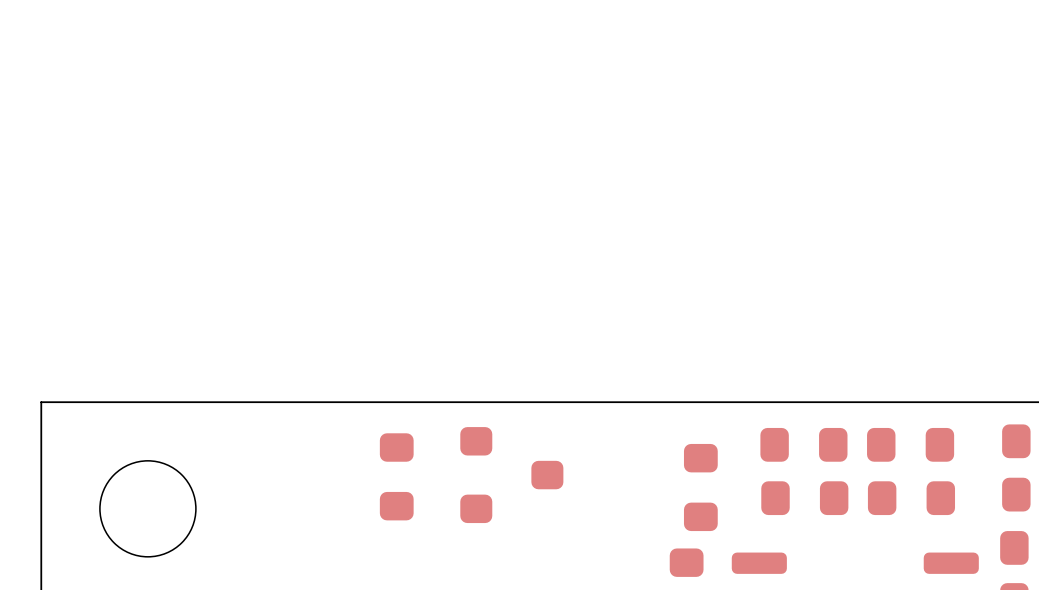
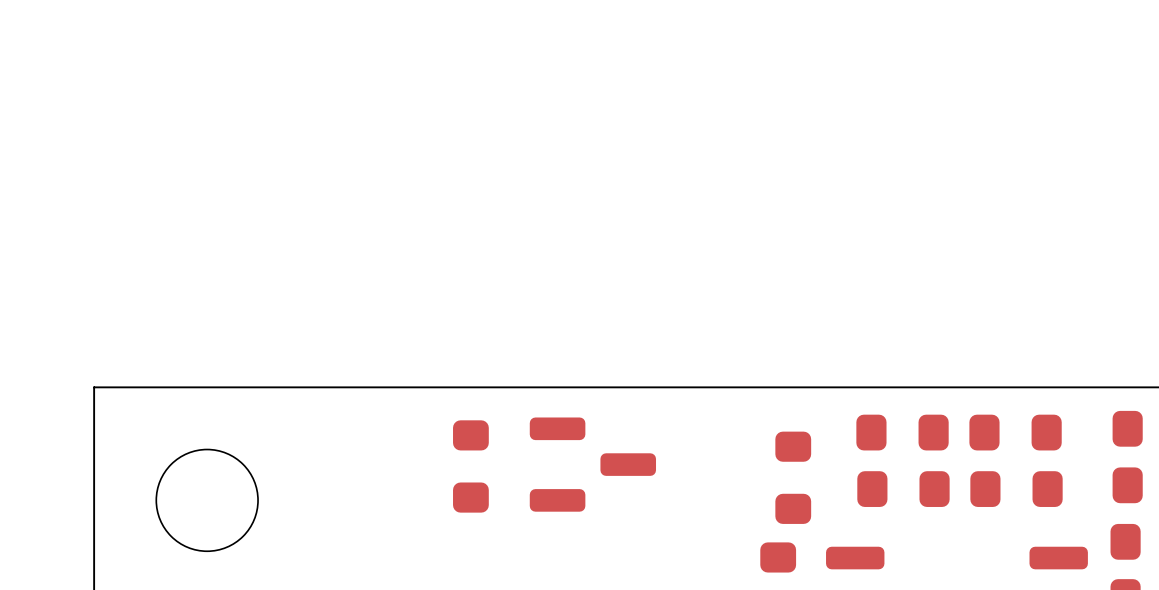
part footprint: [460, 427, 564, 524] -> [529, 417, 657, 512]

